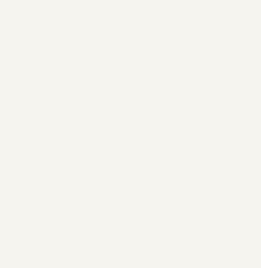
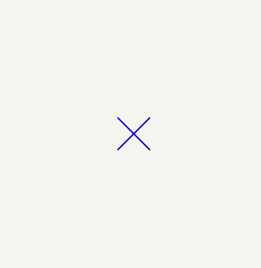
no-connect mark: none -> (133, 133)

